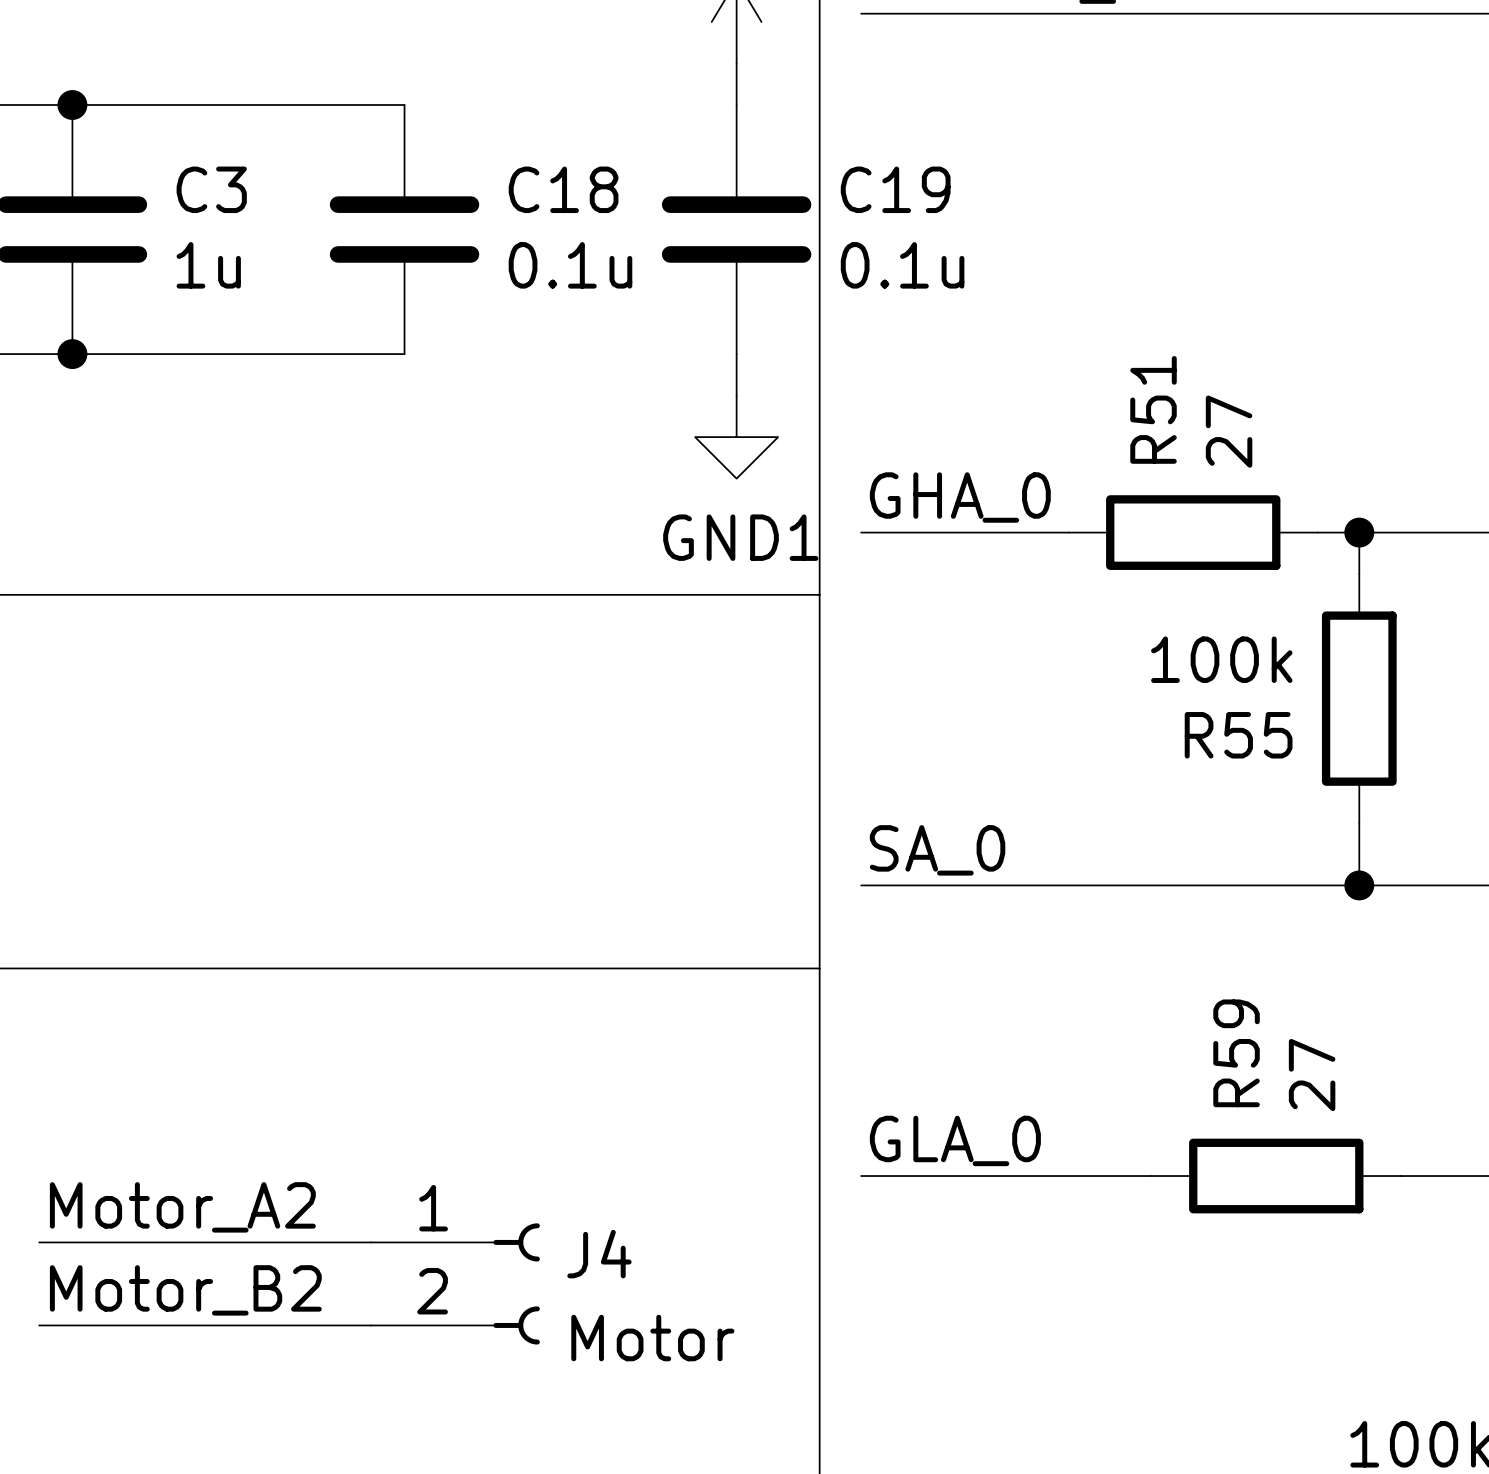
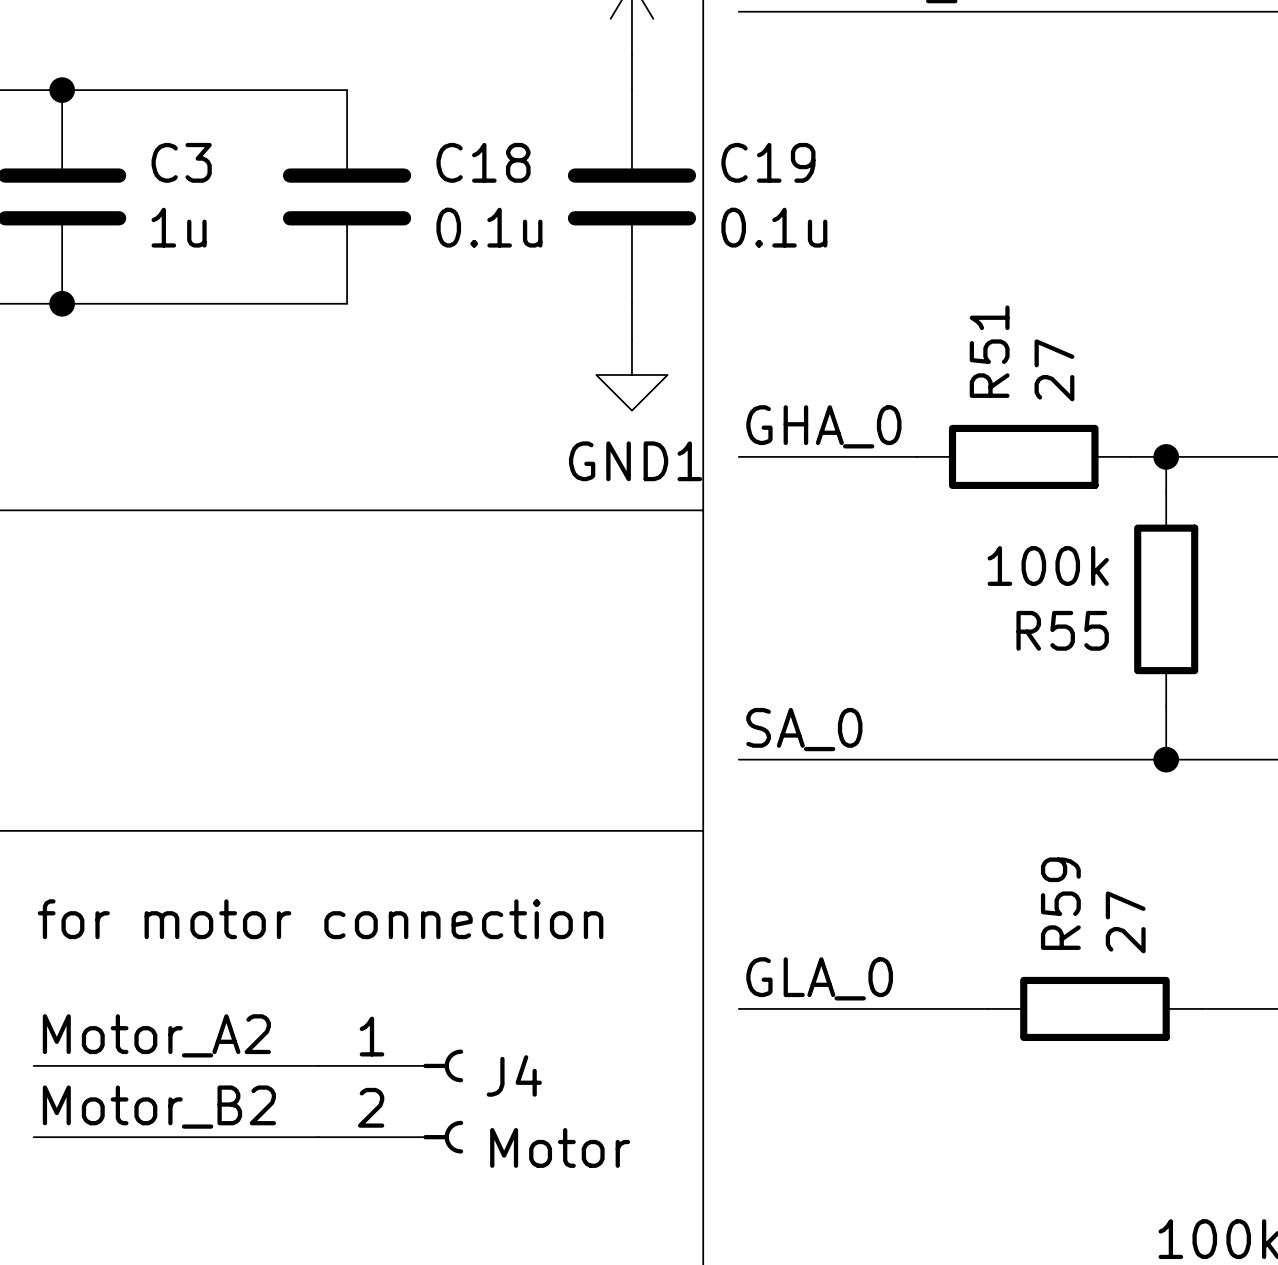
text: none -> for motor connection (320, 919)

